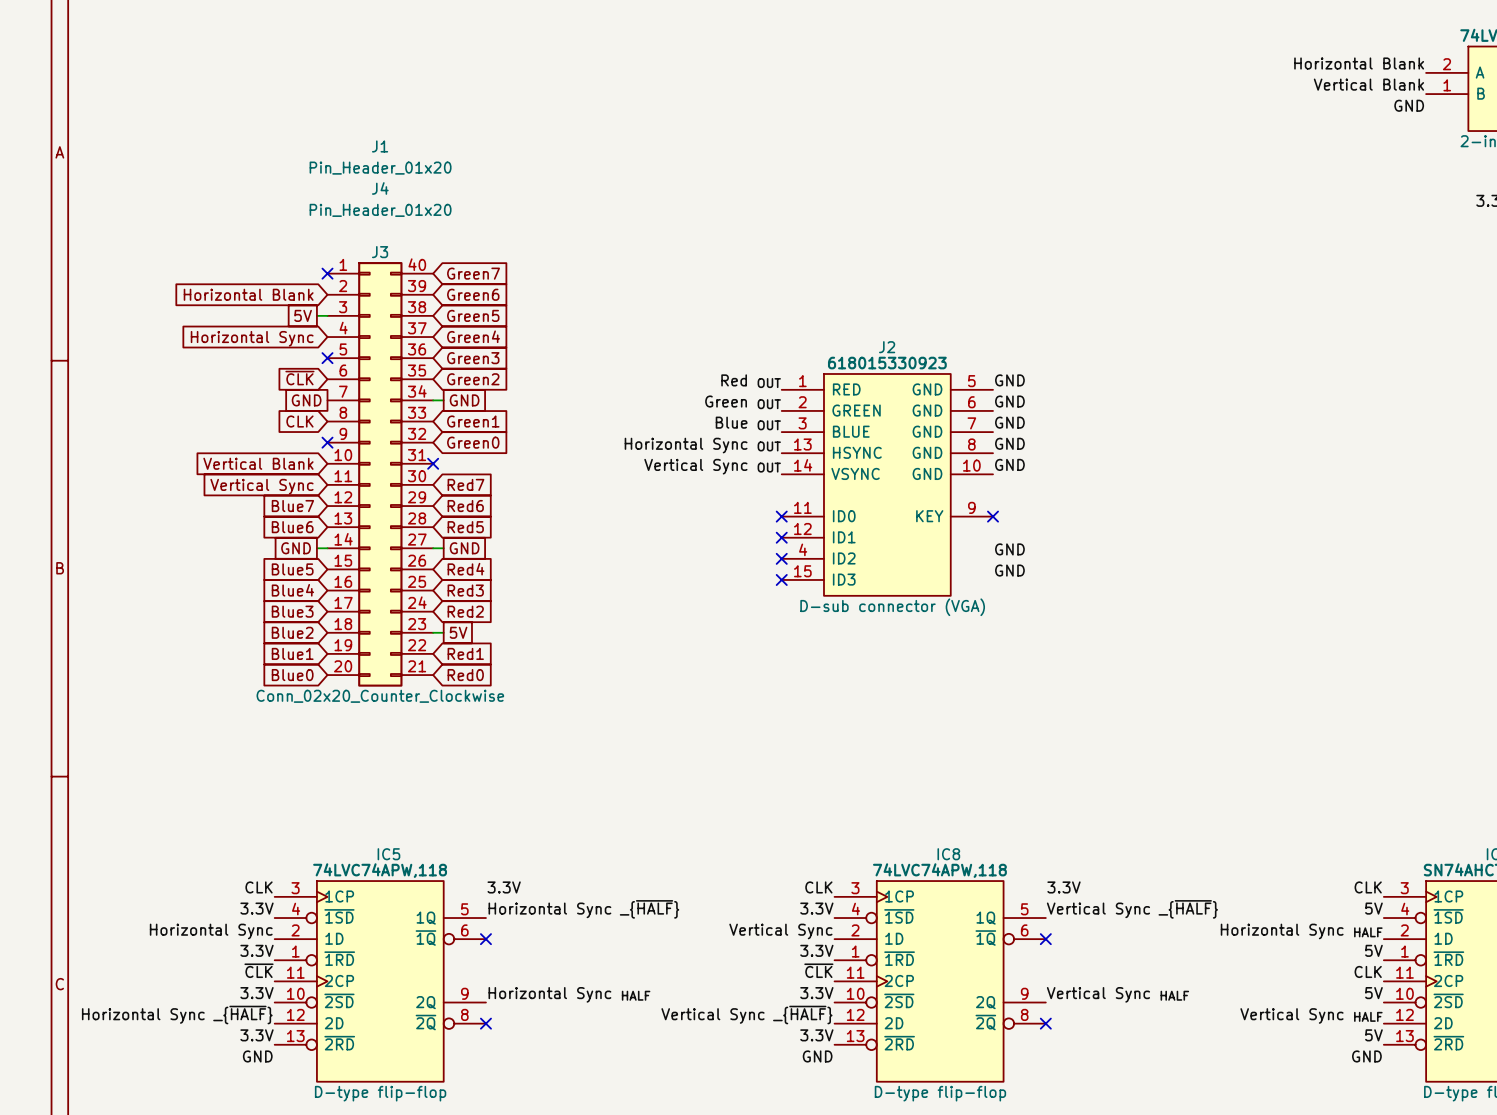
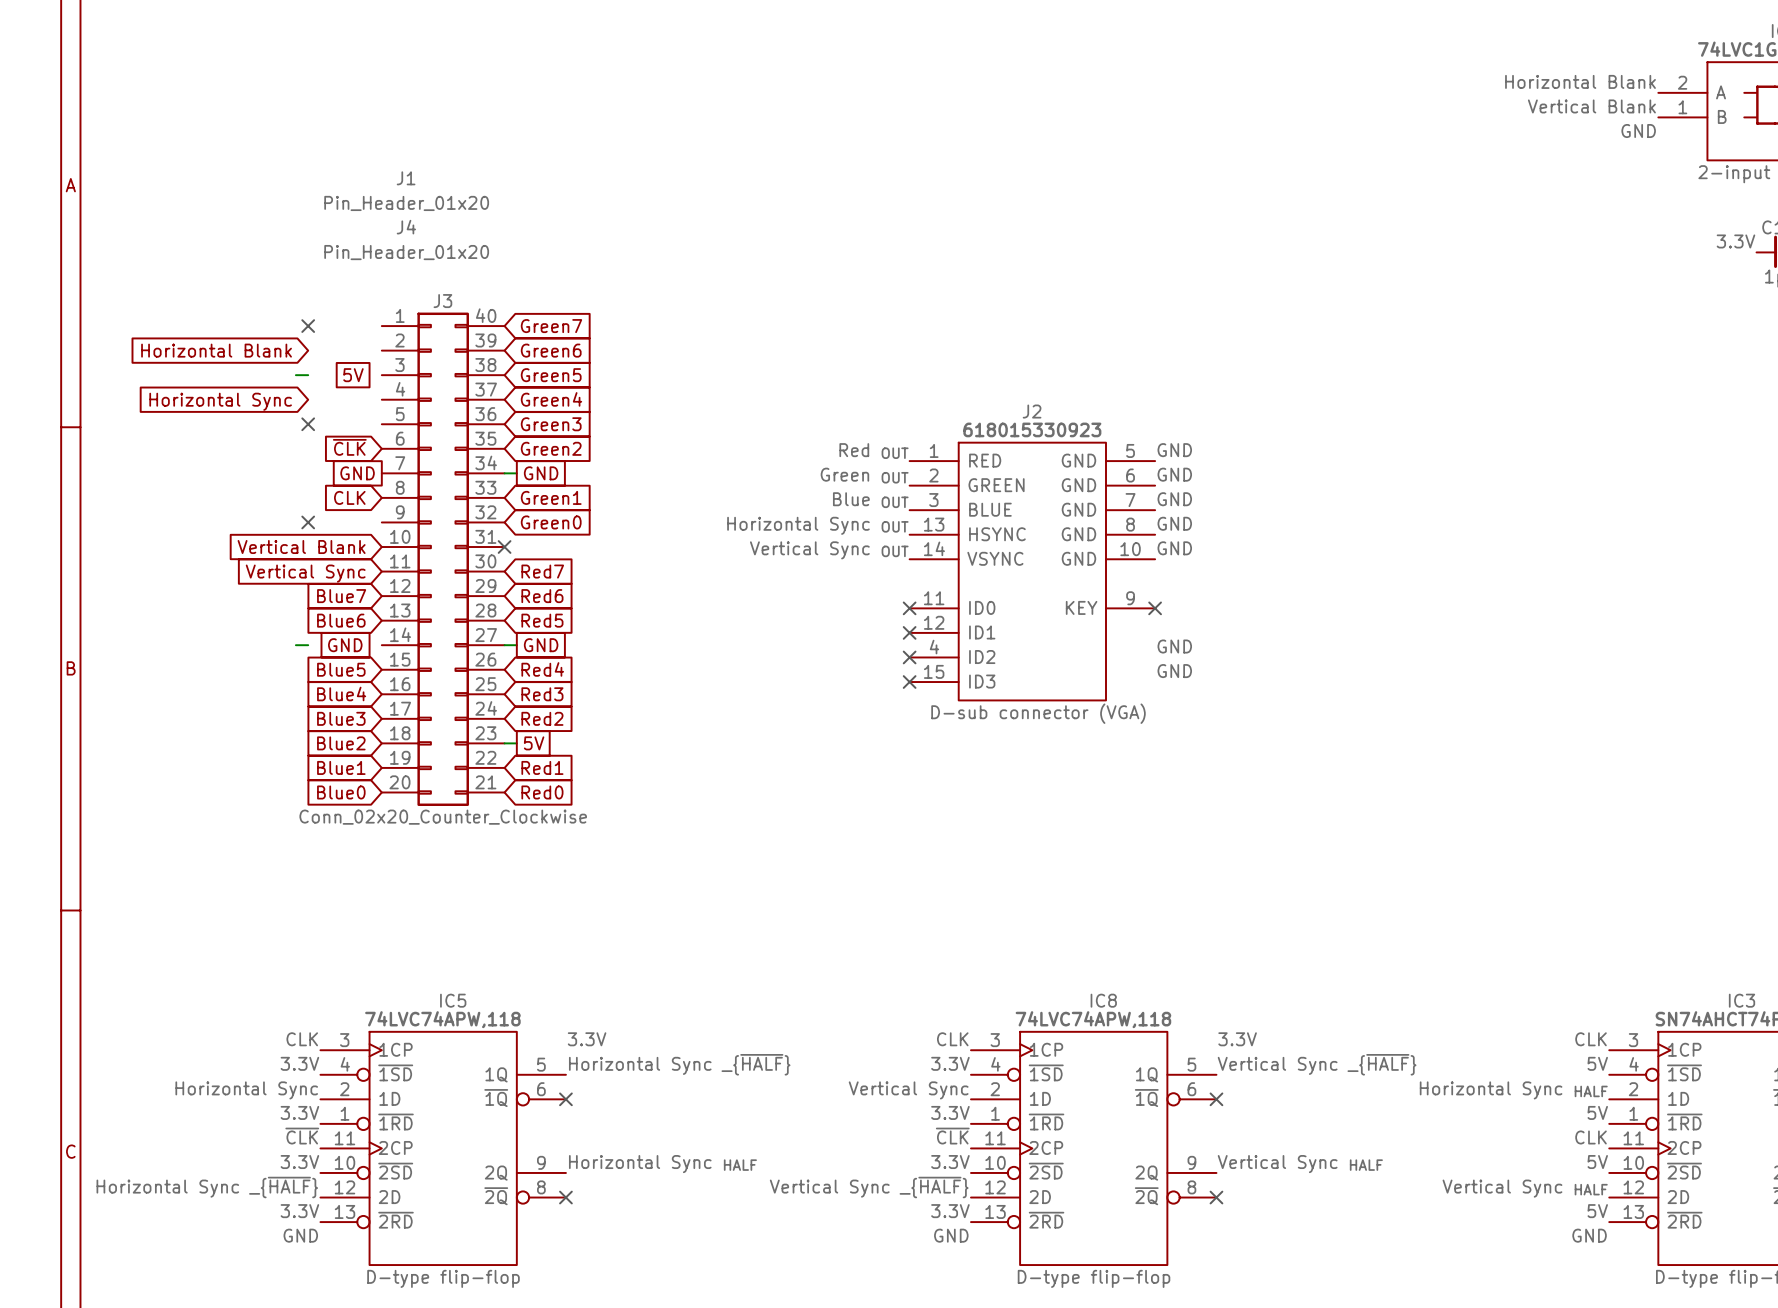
J1 position: (380, 157) -> (406, 191)
J4 position: (380, 199) -> (406, 239)
no-connect mark: none -> (308, 326)
no-connect mark: (327, 273) -> none
global label position: Horizontal Blank (248, 294) -> Horizontal Blank (216, 350)
wire: (316, 315) (327, 315) -> (295, 375) (308, 375)
global label position: Horizontal Sync (252, 338) -> Horizontal Sync (220, 401)
no-connect mark: none -> (308, 424)
no-connect mark: (327, 358) -> none
no-connect mark: none -> (308, 522)
no-connect mark: (327, 442) -> none
wire: (316, 548) (327, 548) -> (295, 645) (308, 645)

